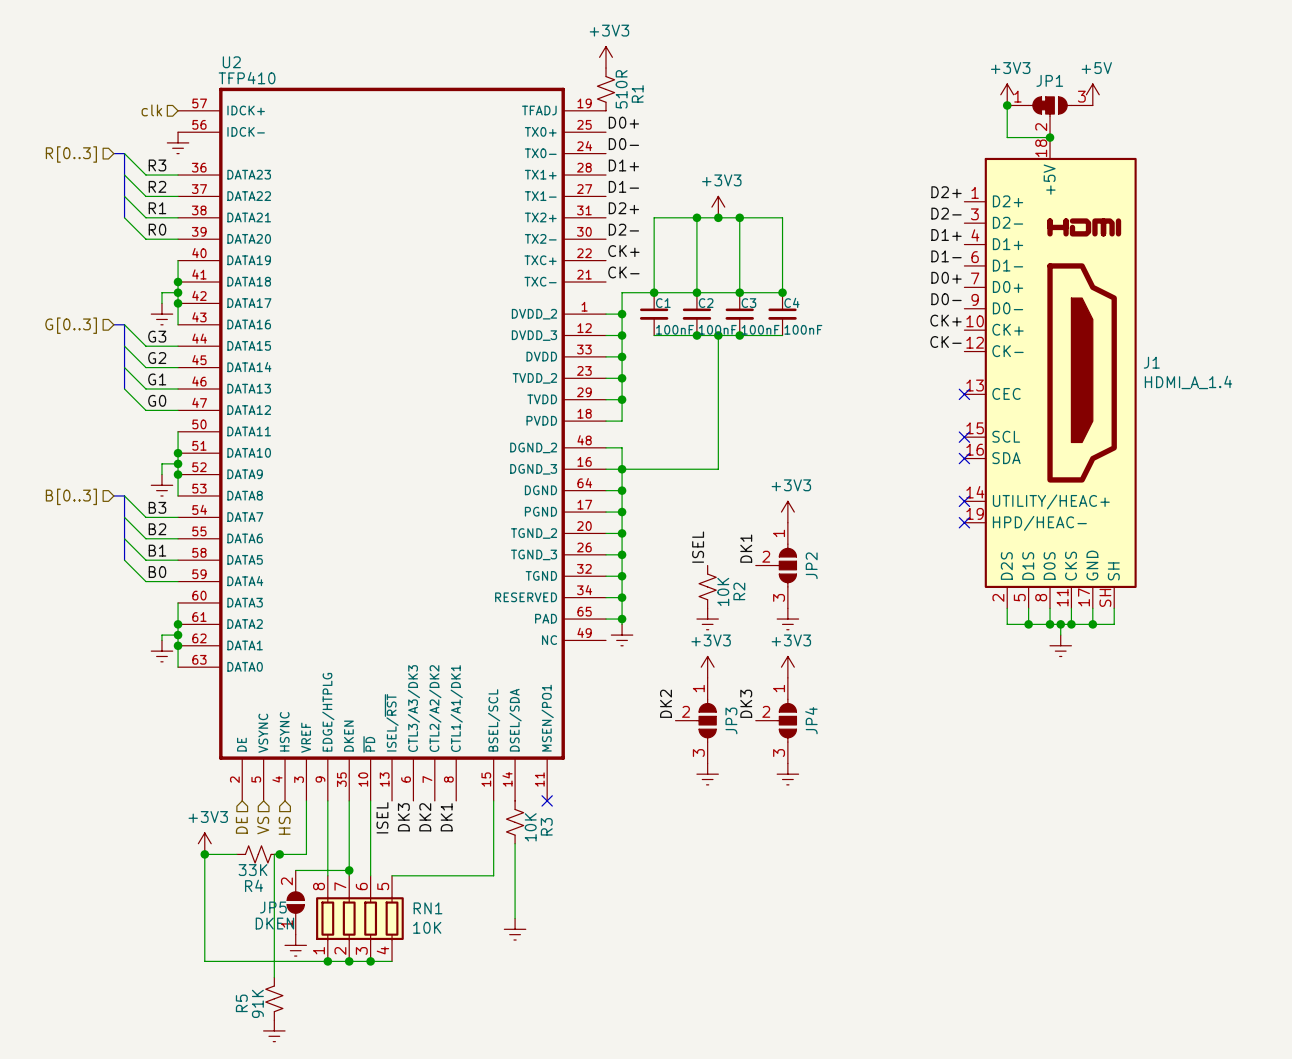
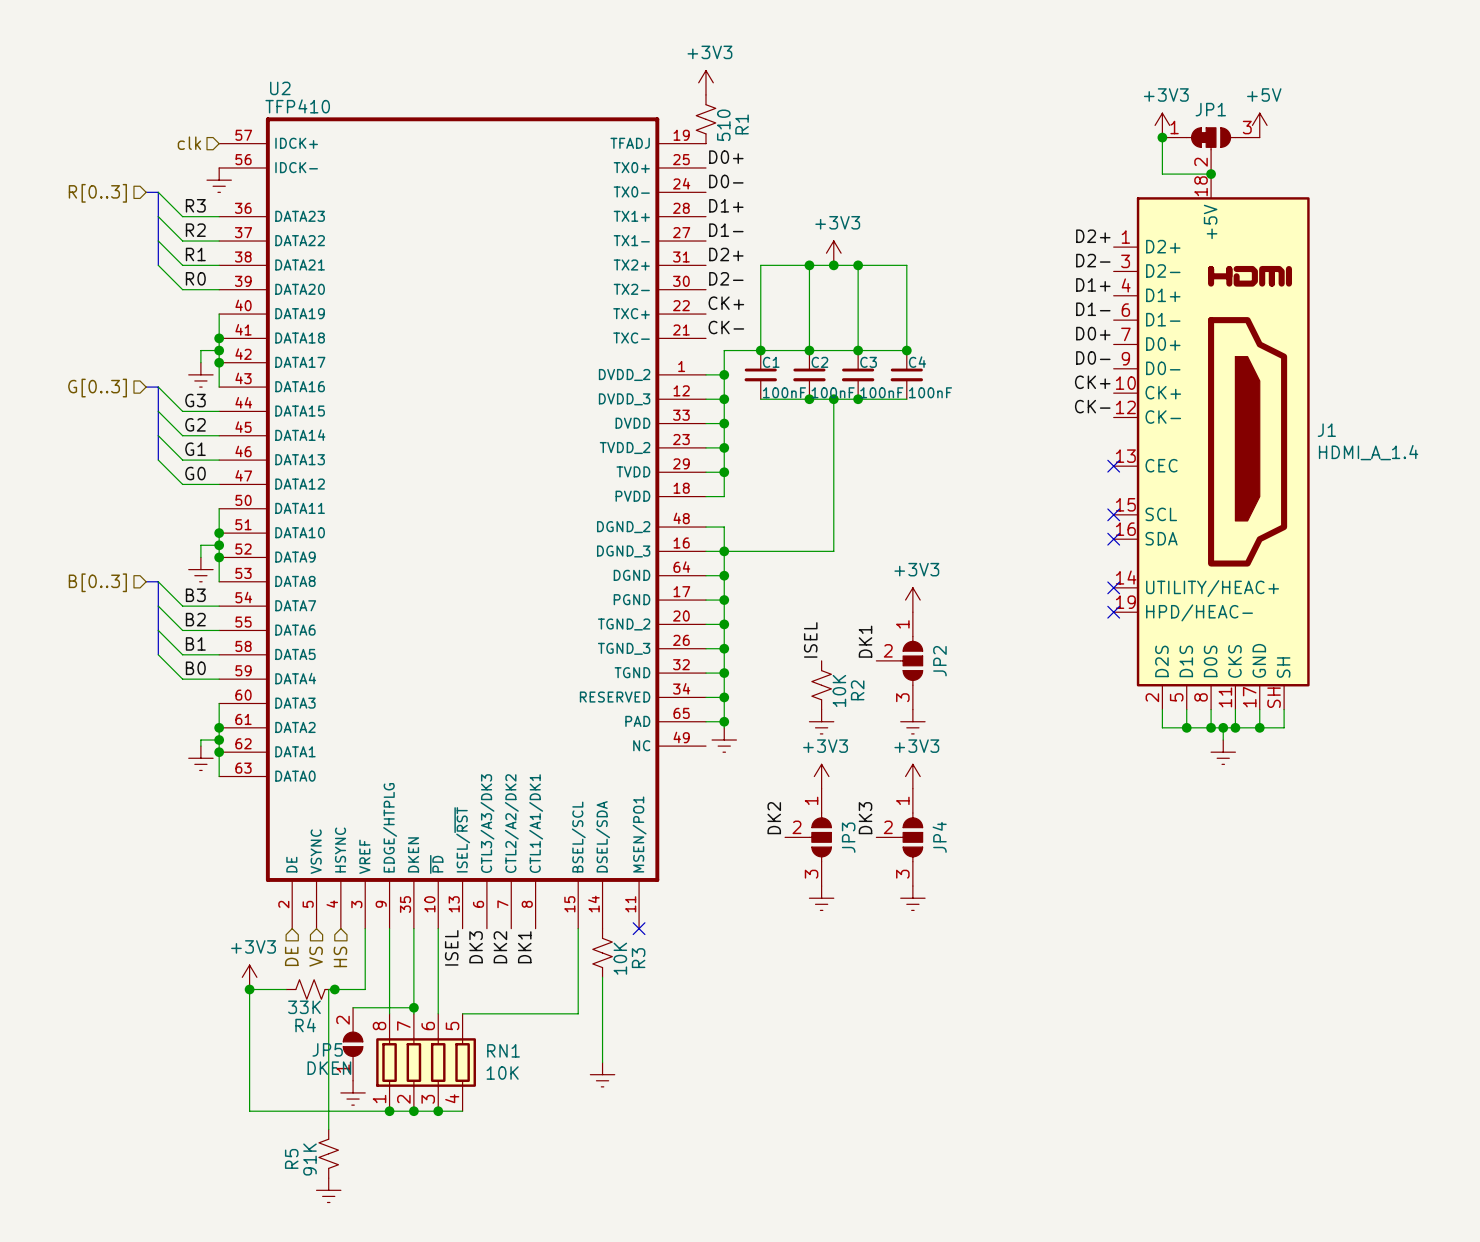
R1 value: 510R (621, 89) -> 510 (723, 125)

